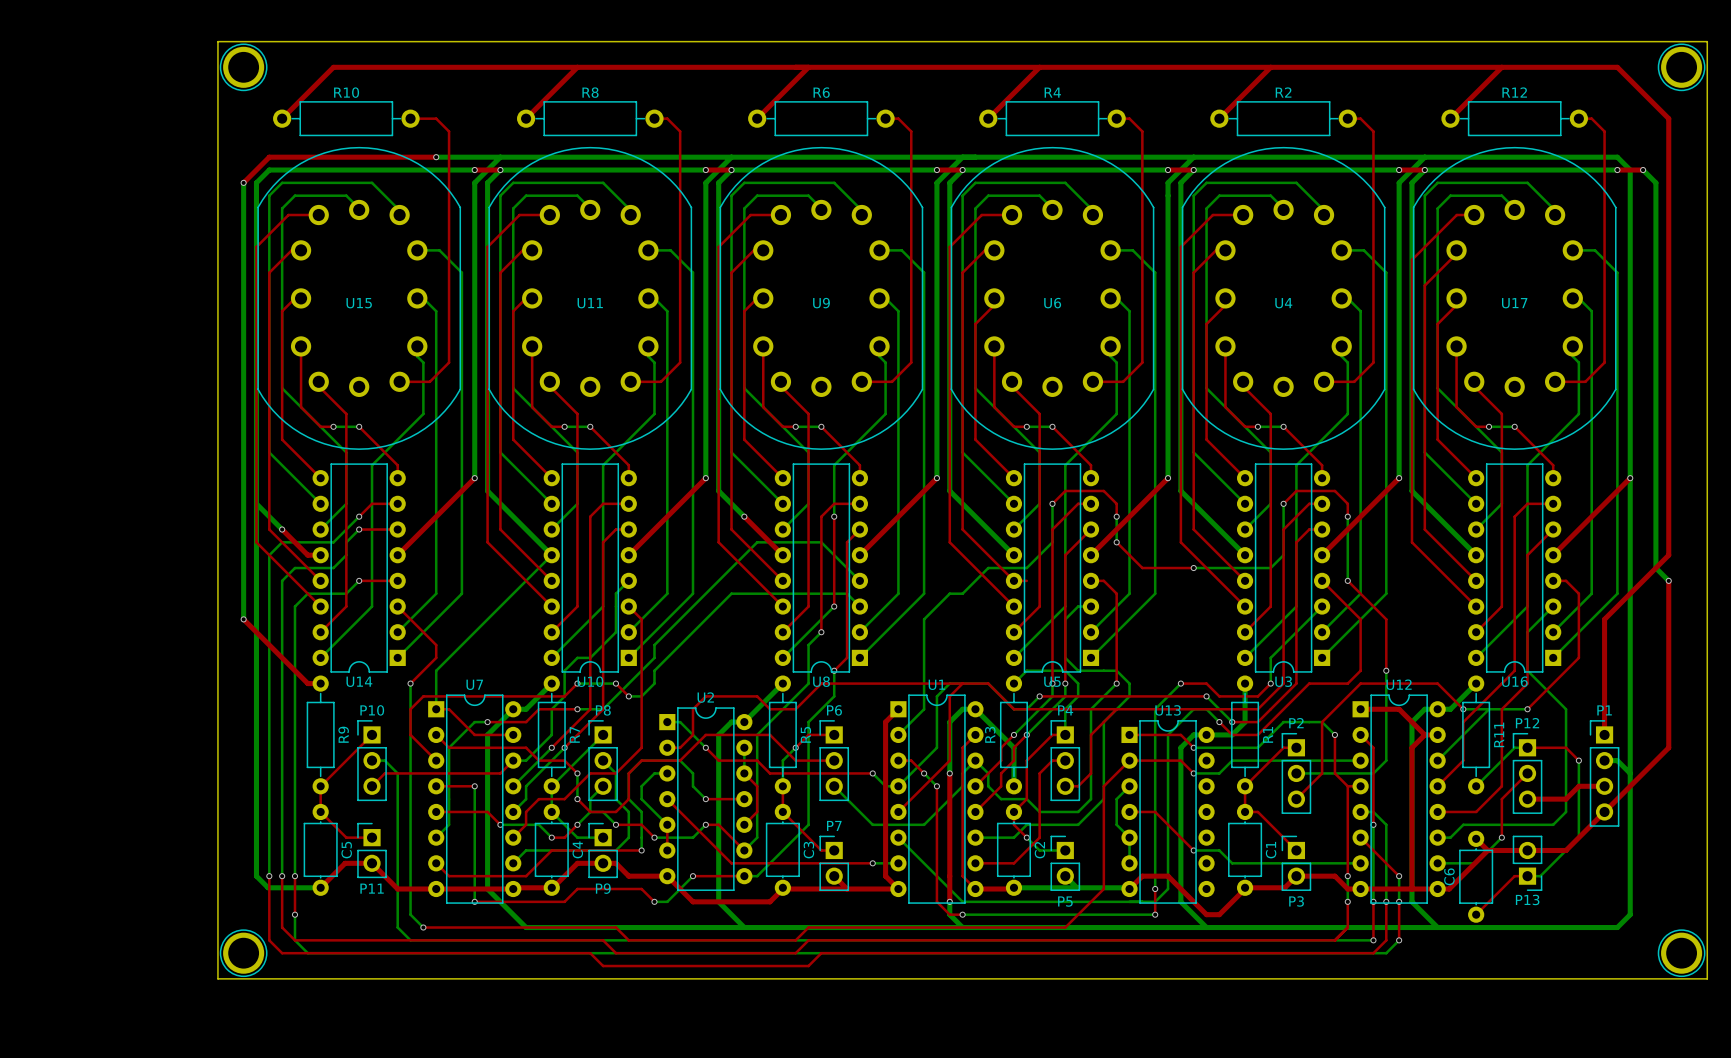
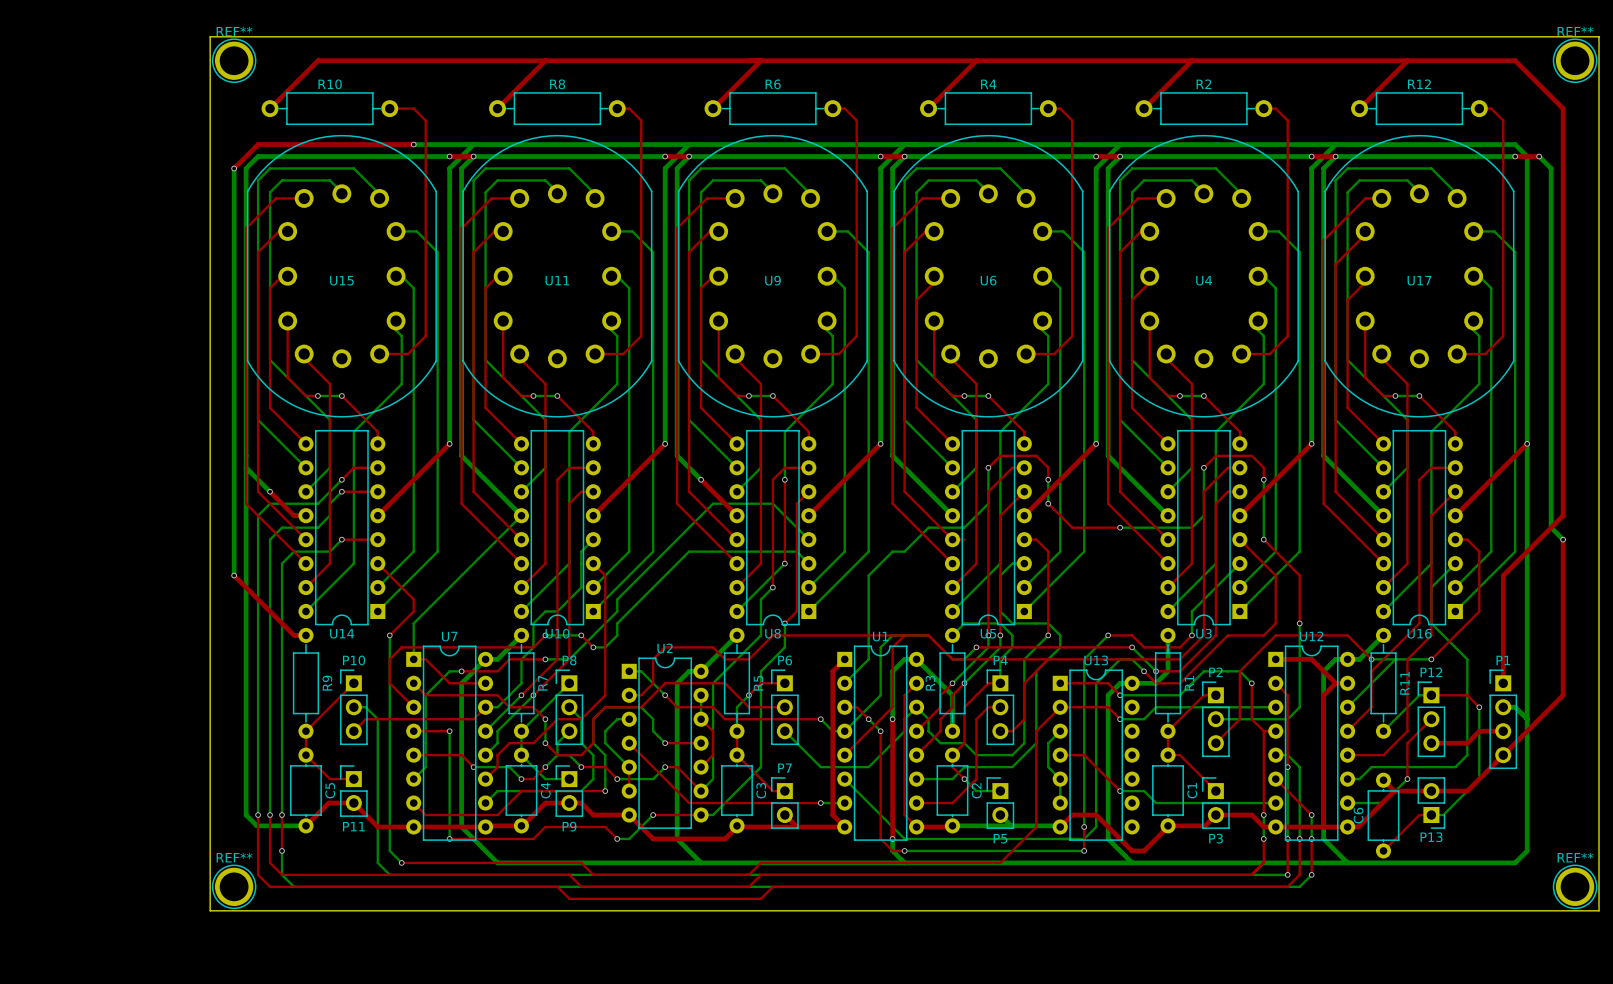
REF** name: none -> REF** (234, 31)
REF** name: none -> REF** (1575, 31)
REF** name: none -> REF** (234, 857)
REF** name: none -> REF** (1575, 857)

